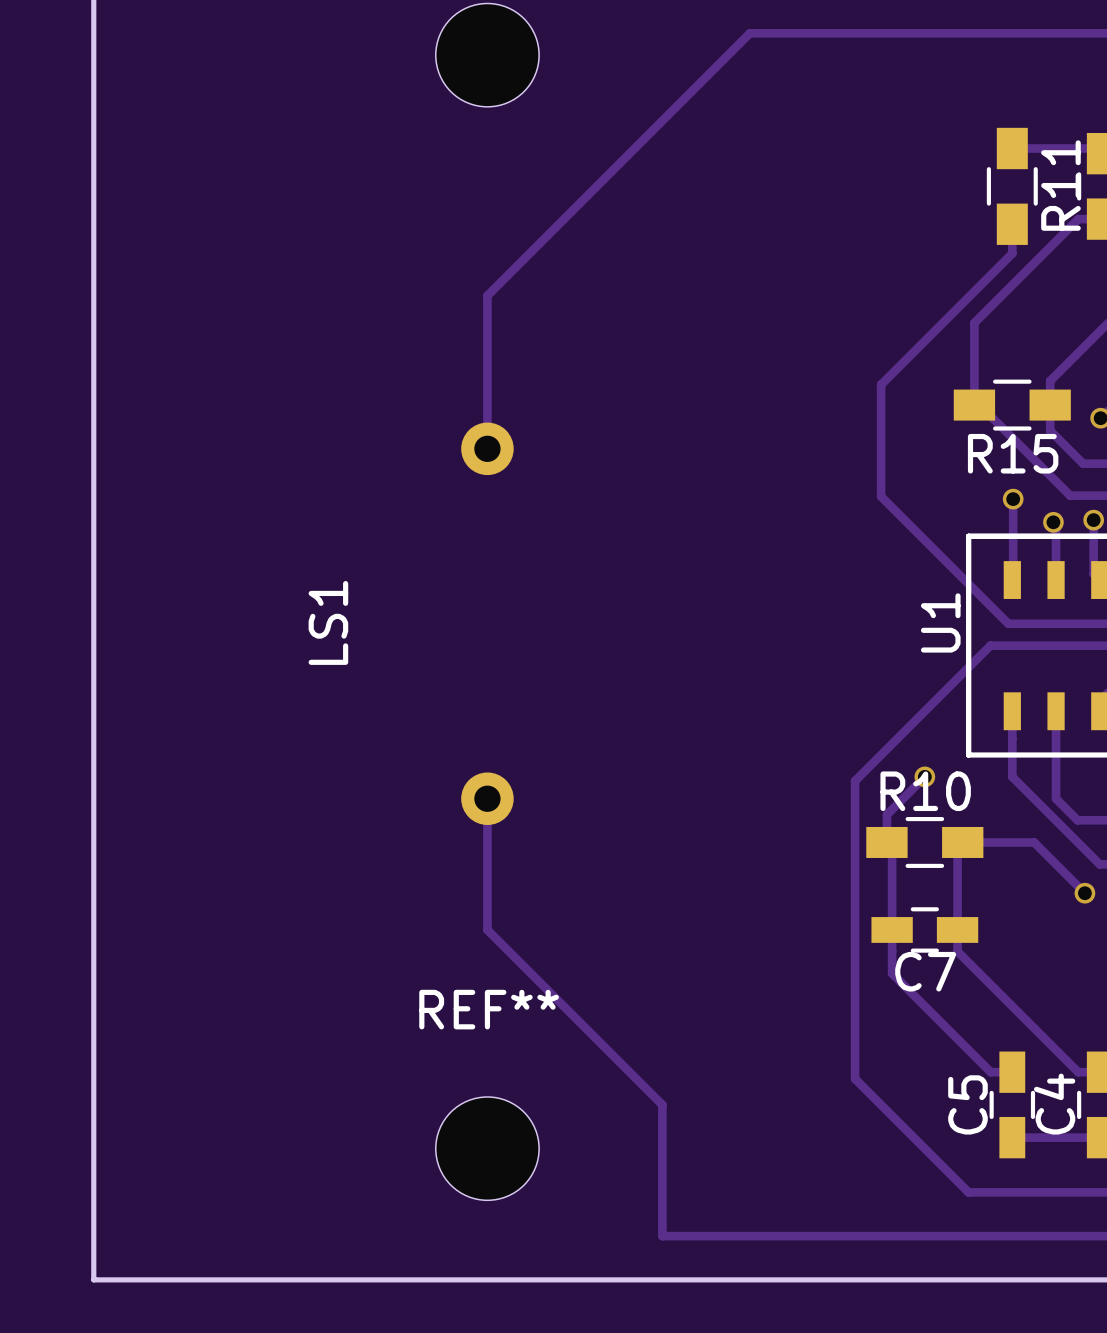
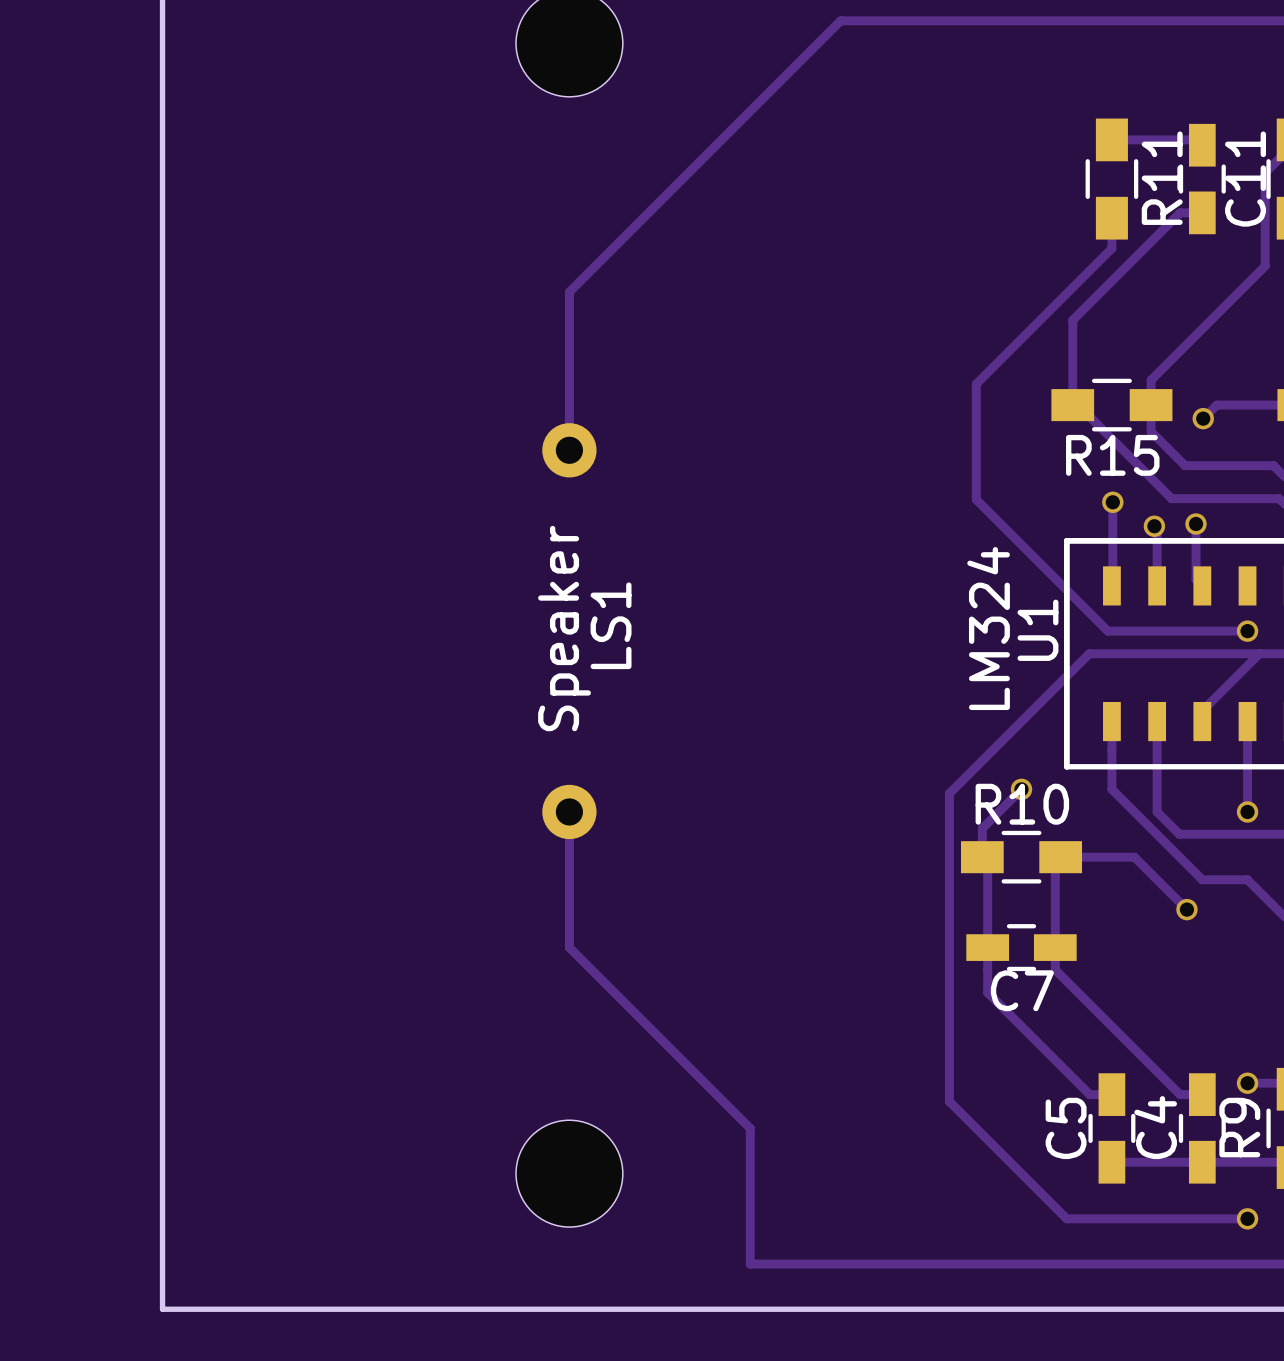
LS1 value: none -> Speaker (564, 628)
U1 value: none -> LM324 (988, 628)
LS1 name position: LS1 (328, 622) -> LS1 (611, 625)
REF** name: REF** (489, 1009) -> none

